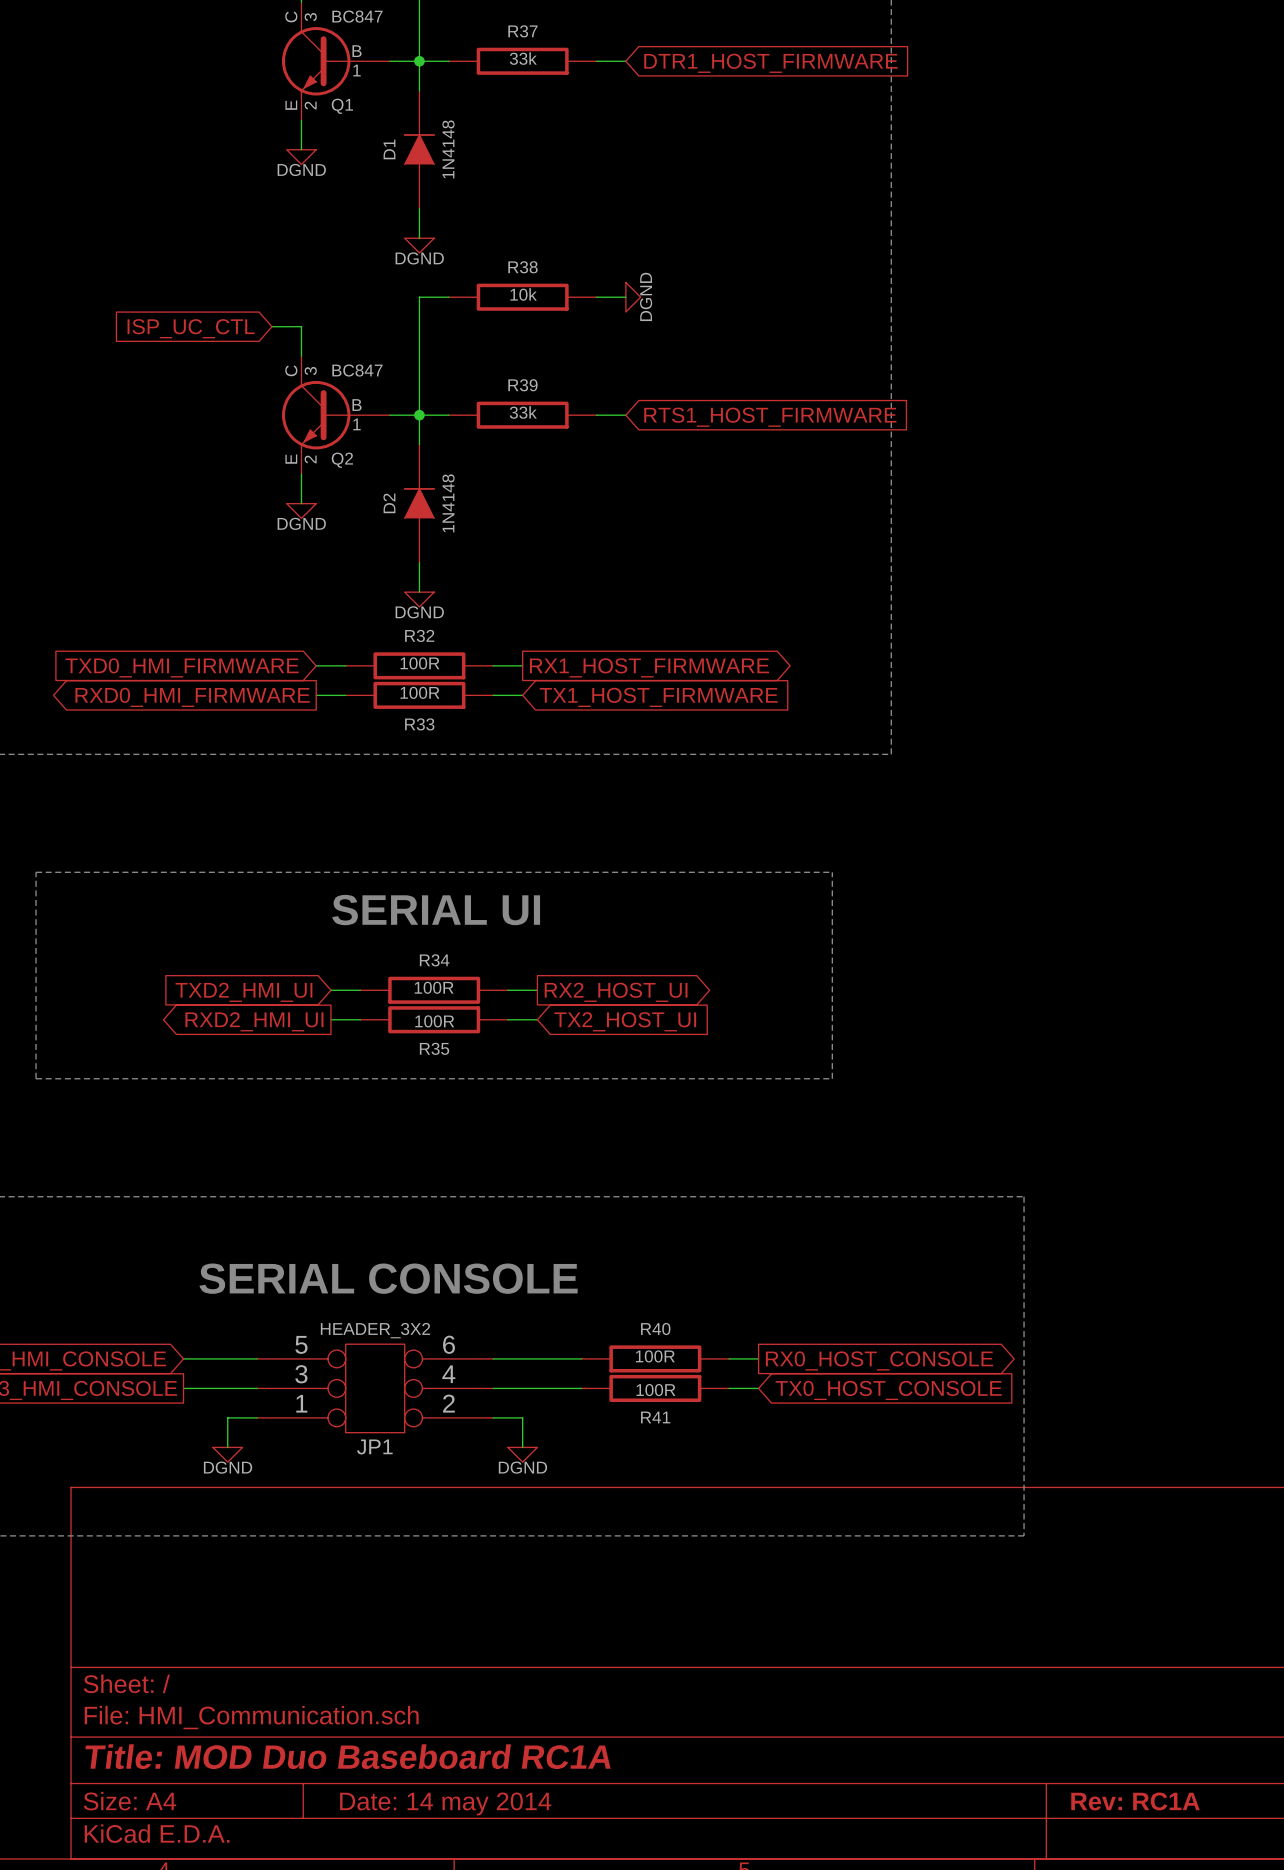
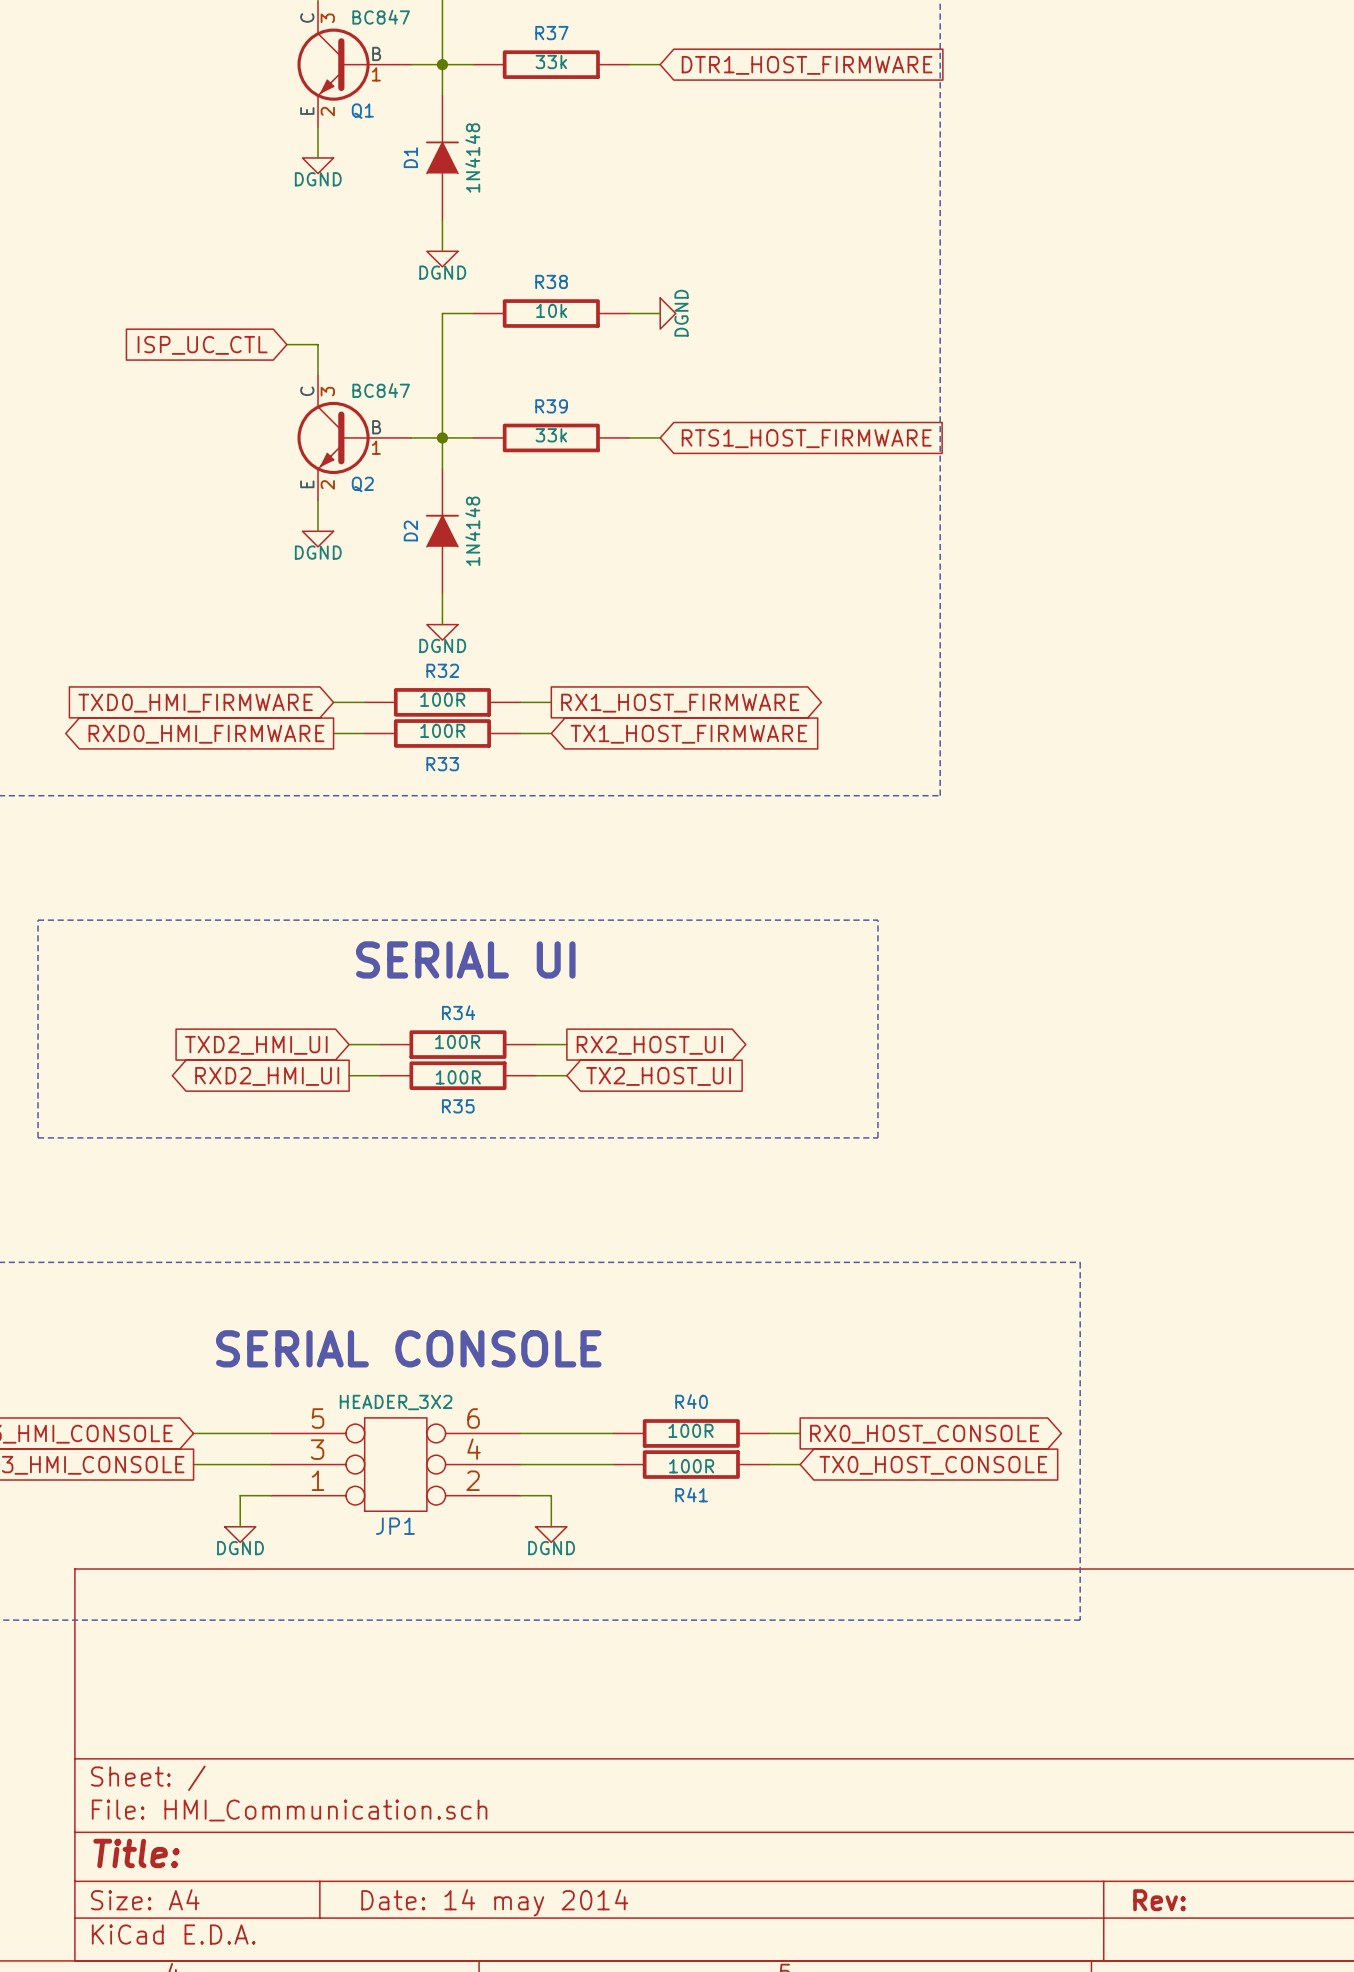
title block: Title: MOD Duo Baseboard RC1A (348, 1756) -> Title: (136, 1853)
title block: Rev: RC1A (1135, 1801) -> Rev: (1159, 1900)

